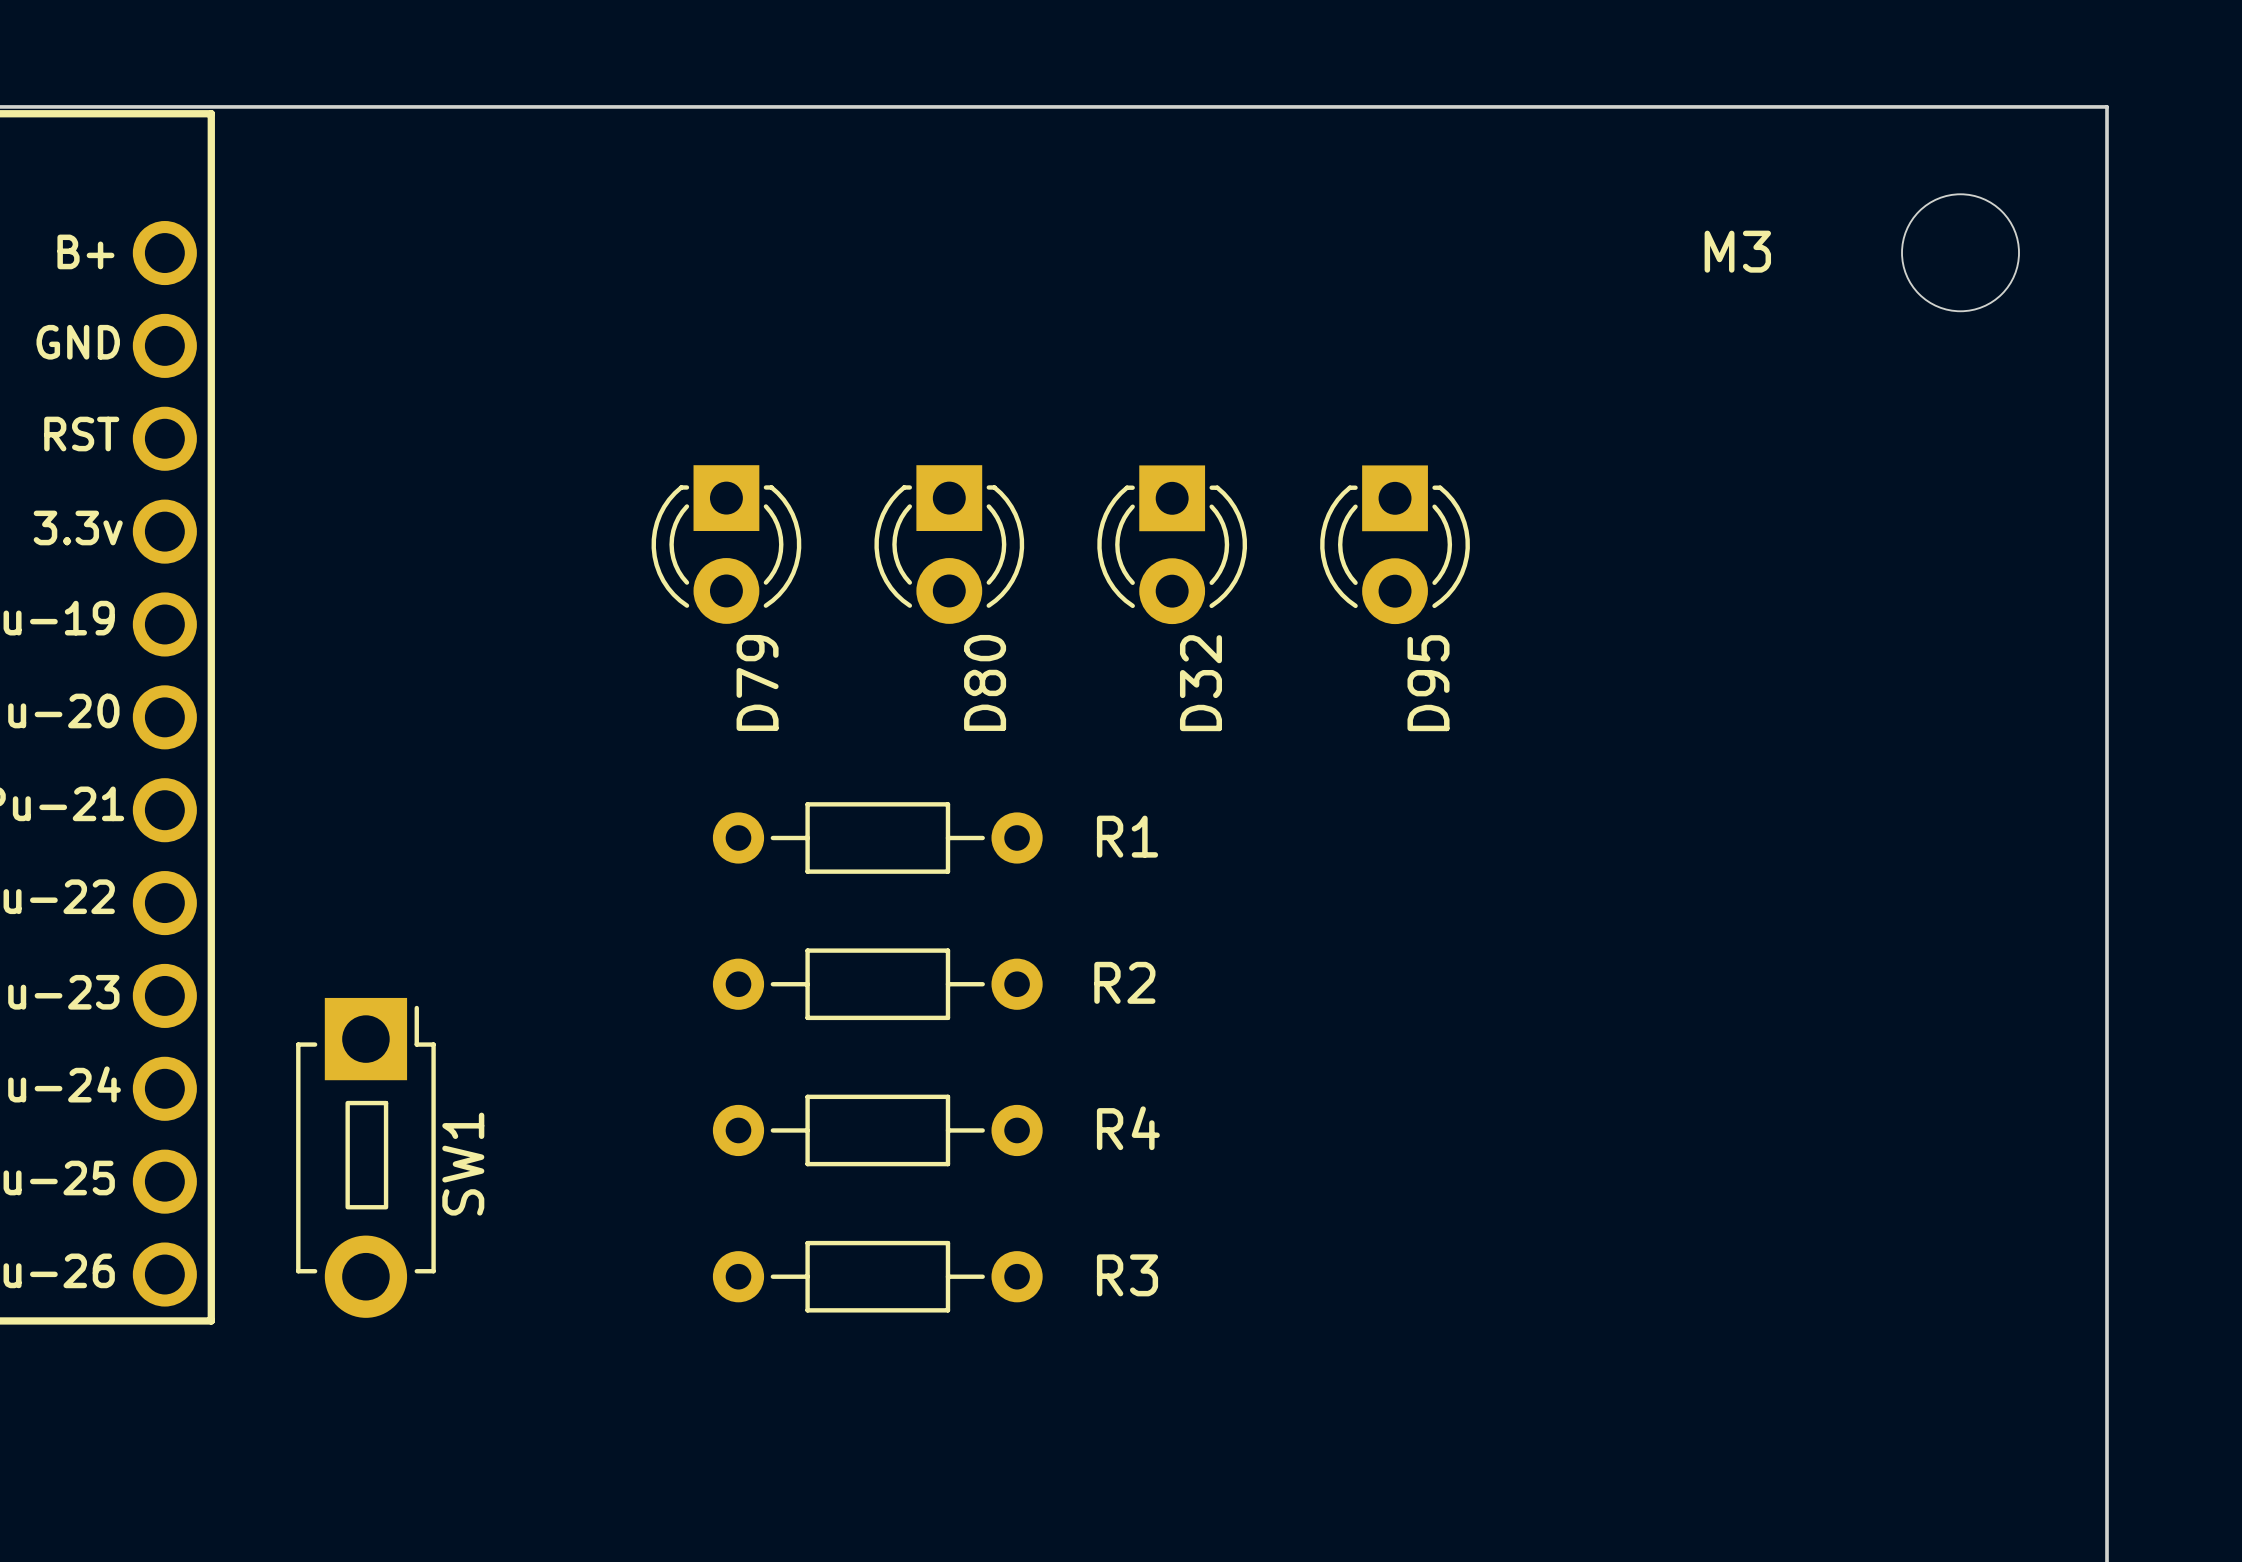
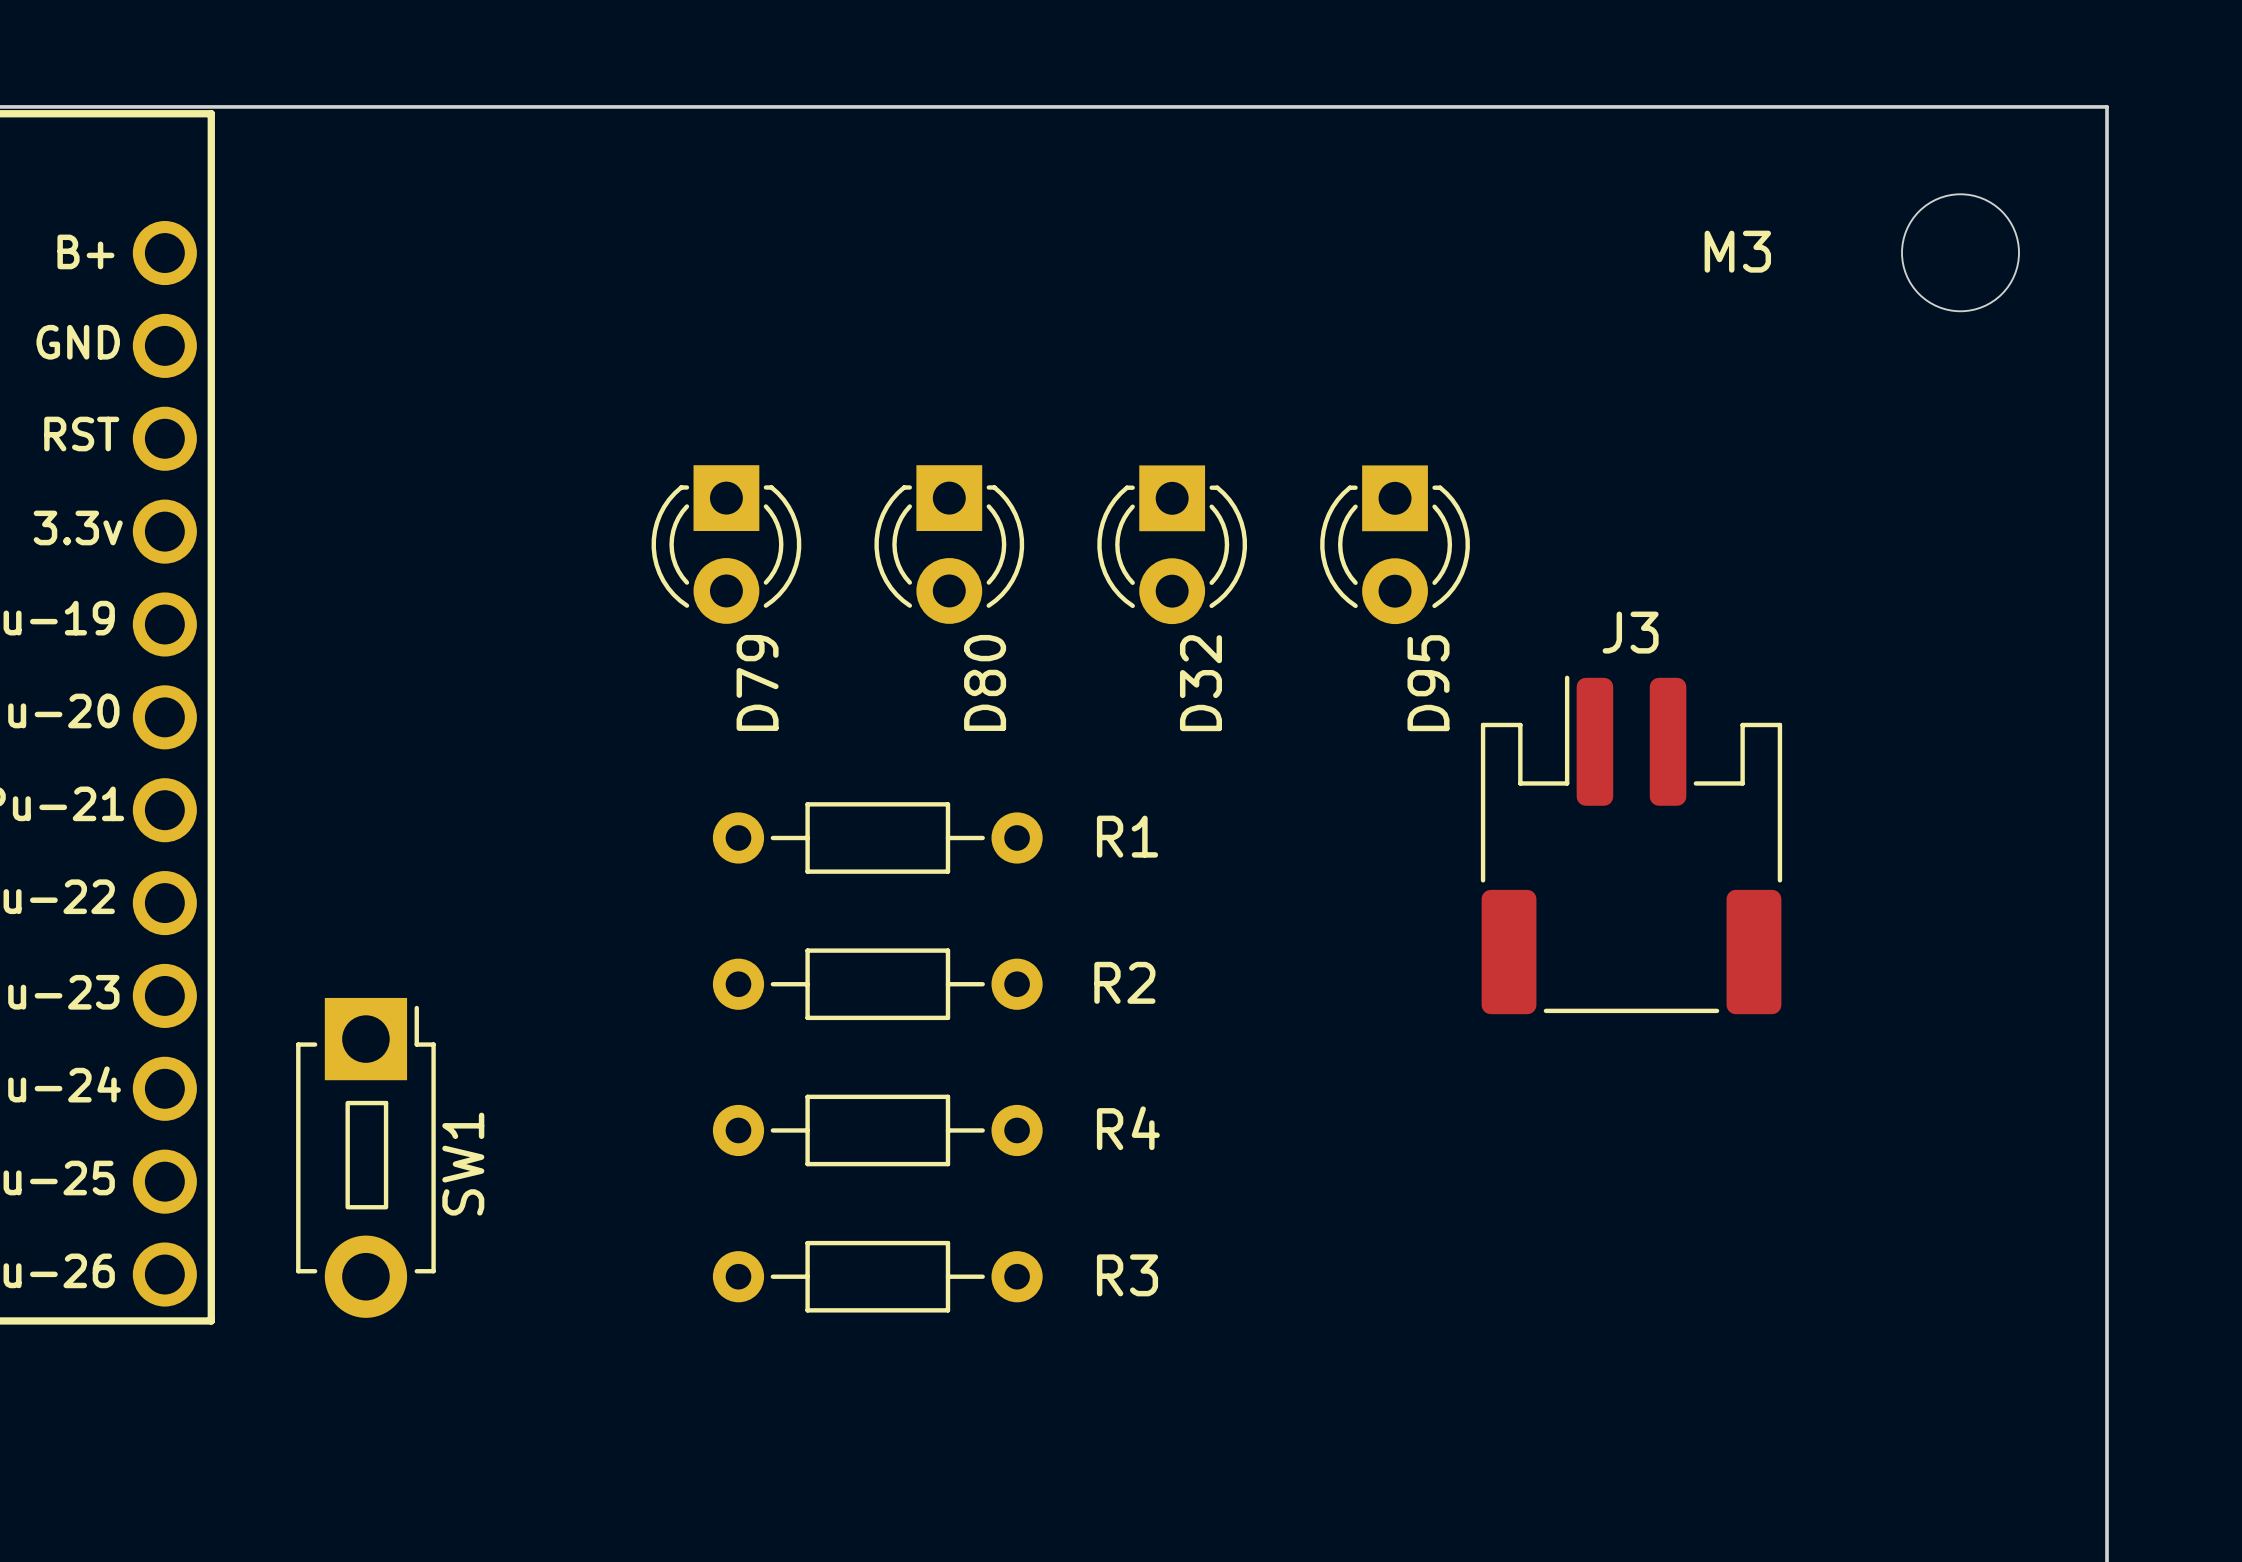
J3: none -> (1631, 844)

